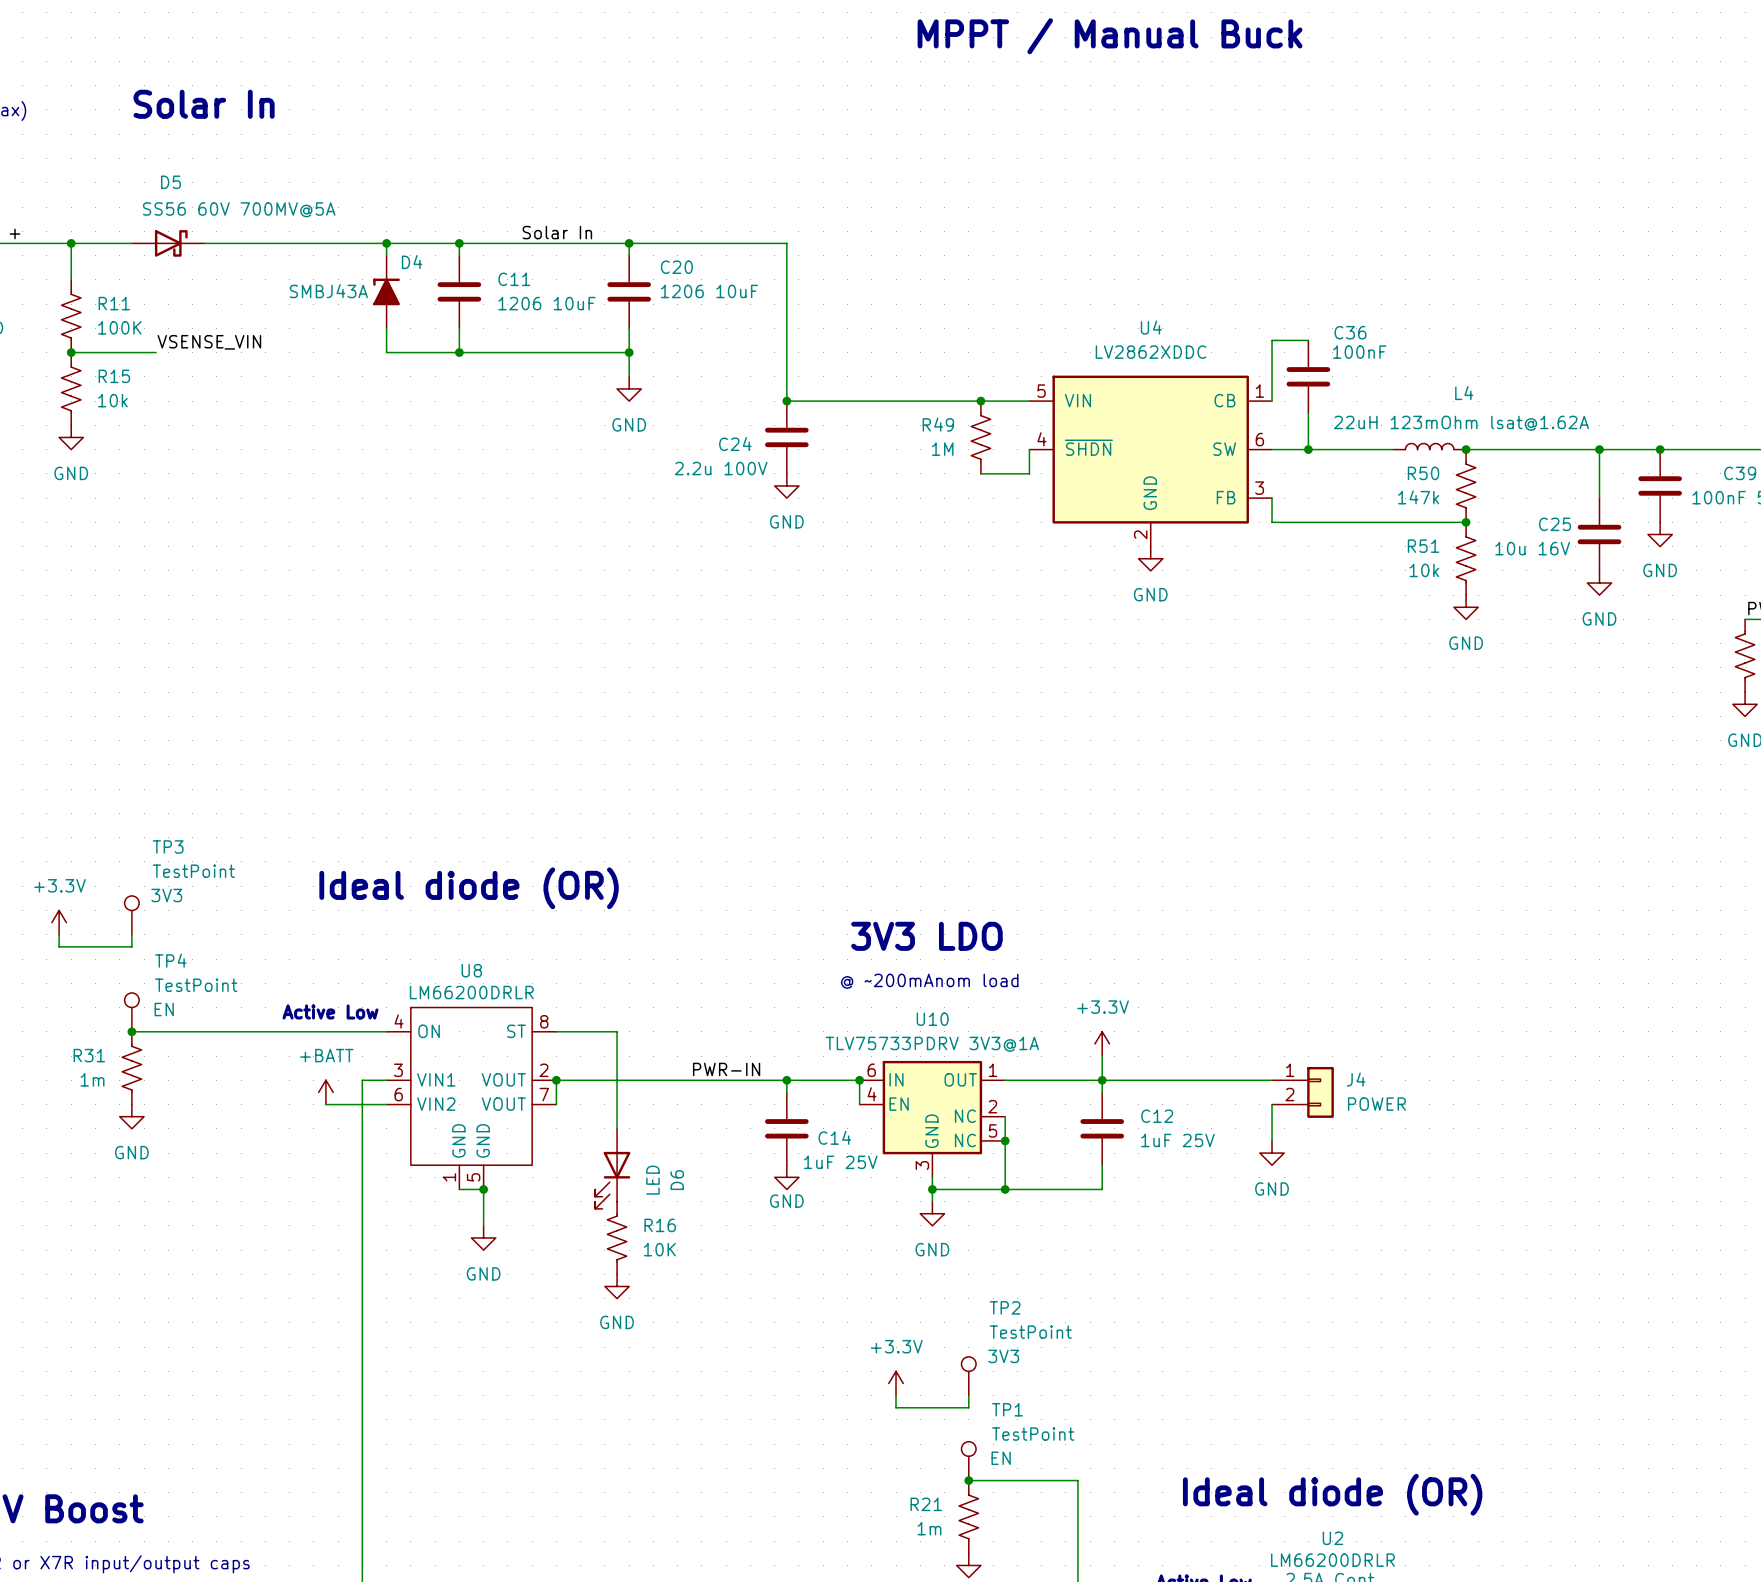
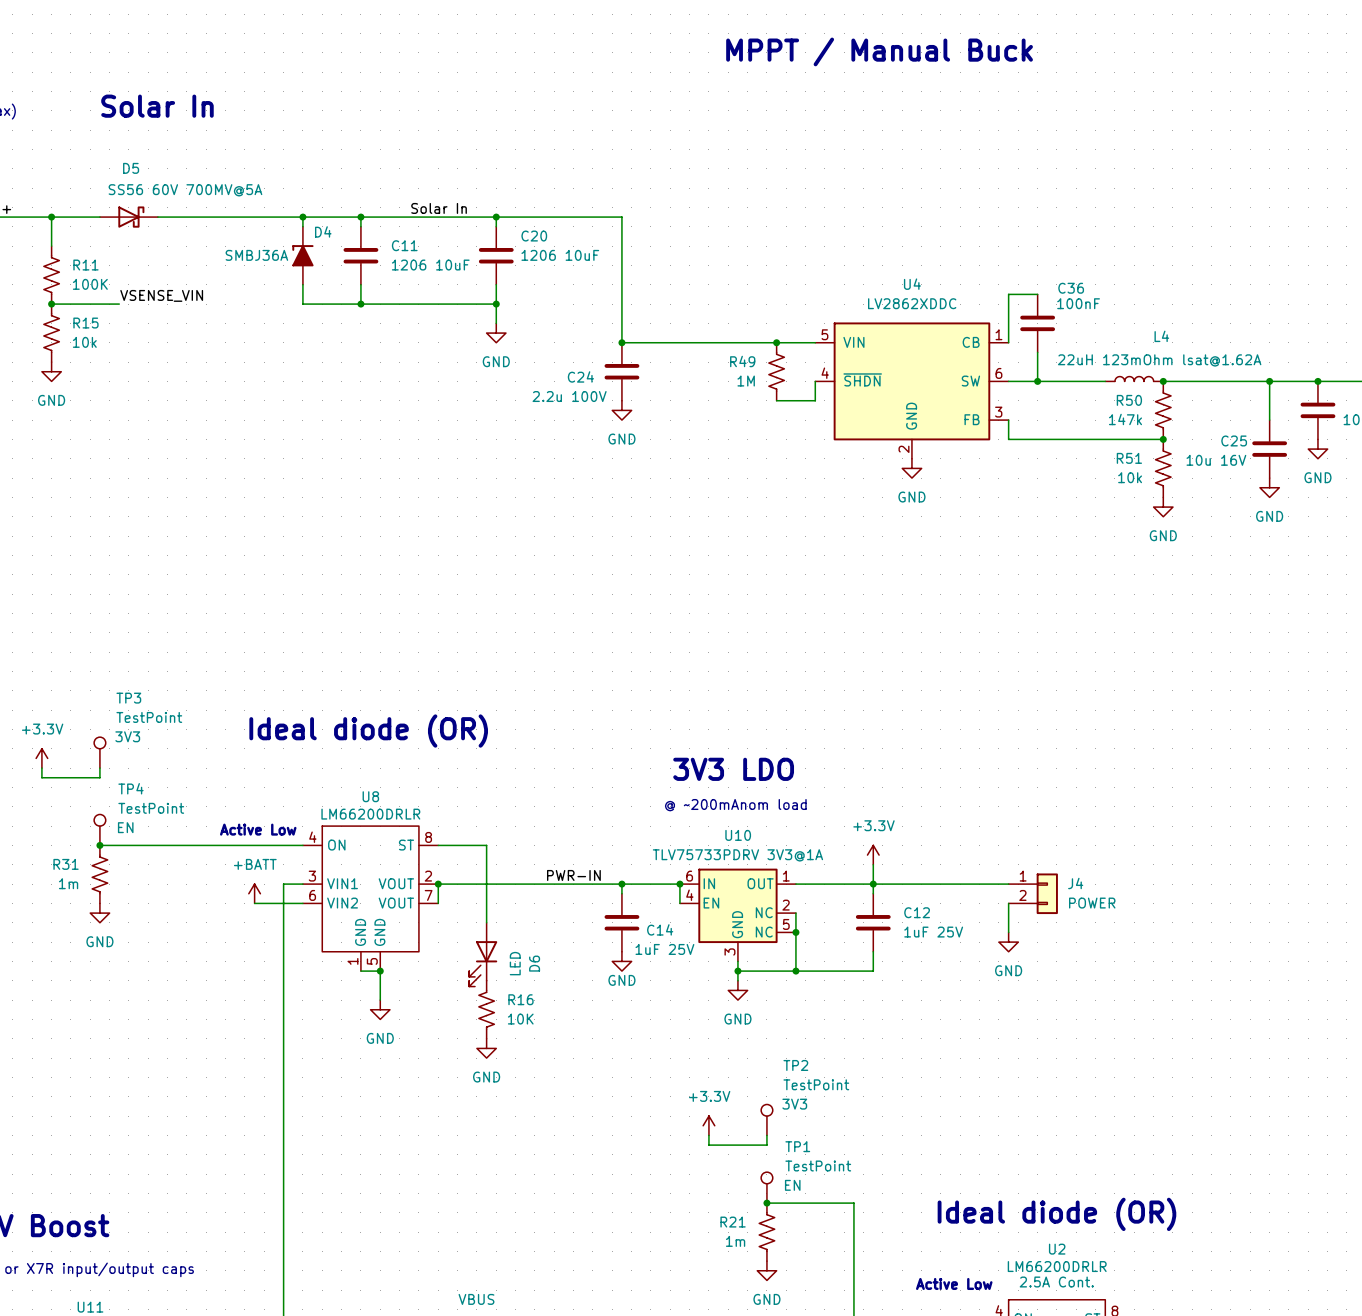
D4 value: SMBJ43A (328, 291) -> SMBJ36A (256, 255)

